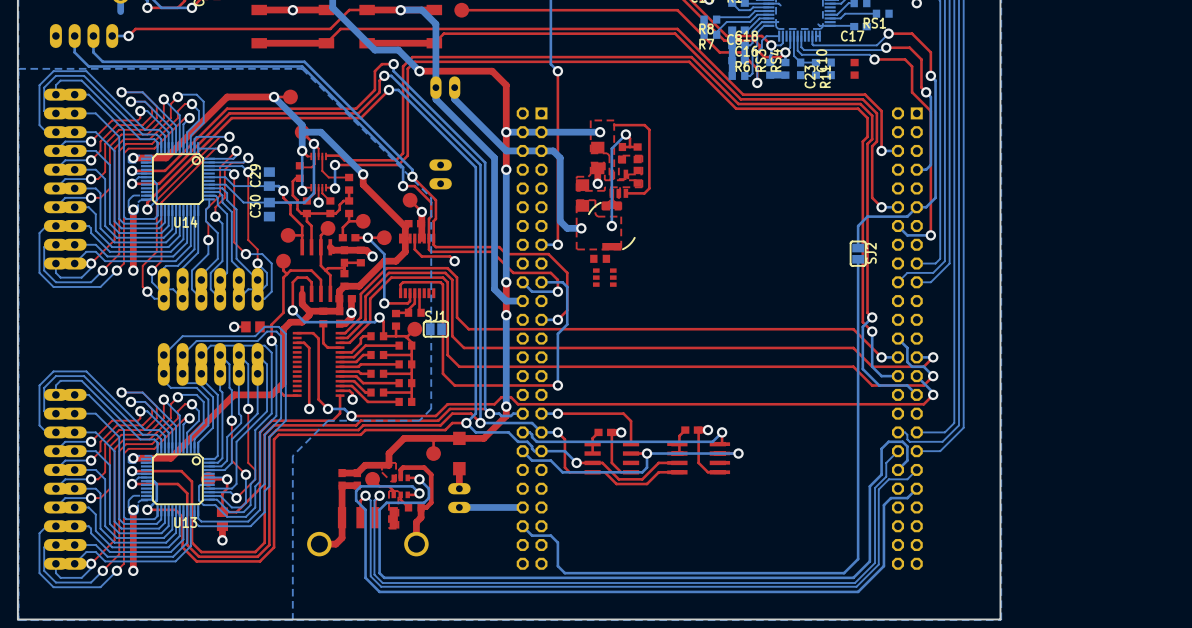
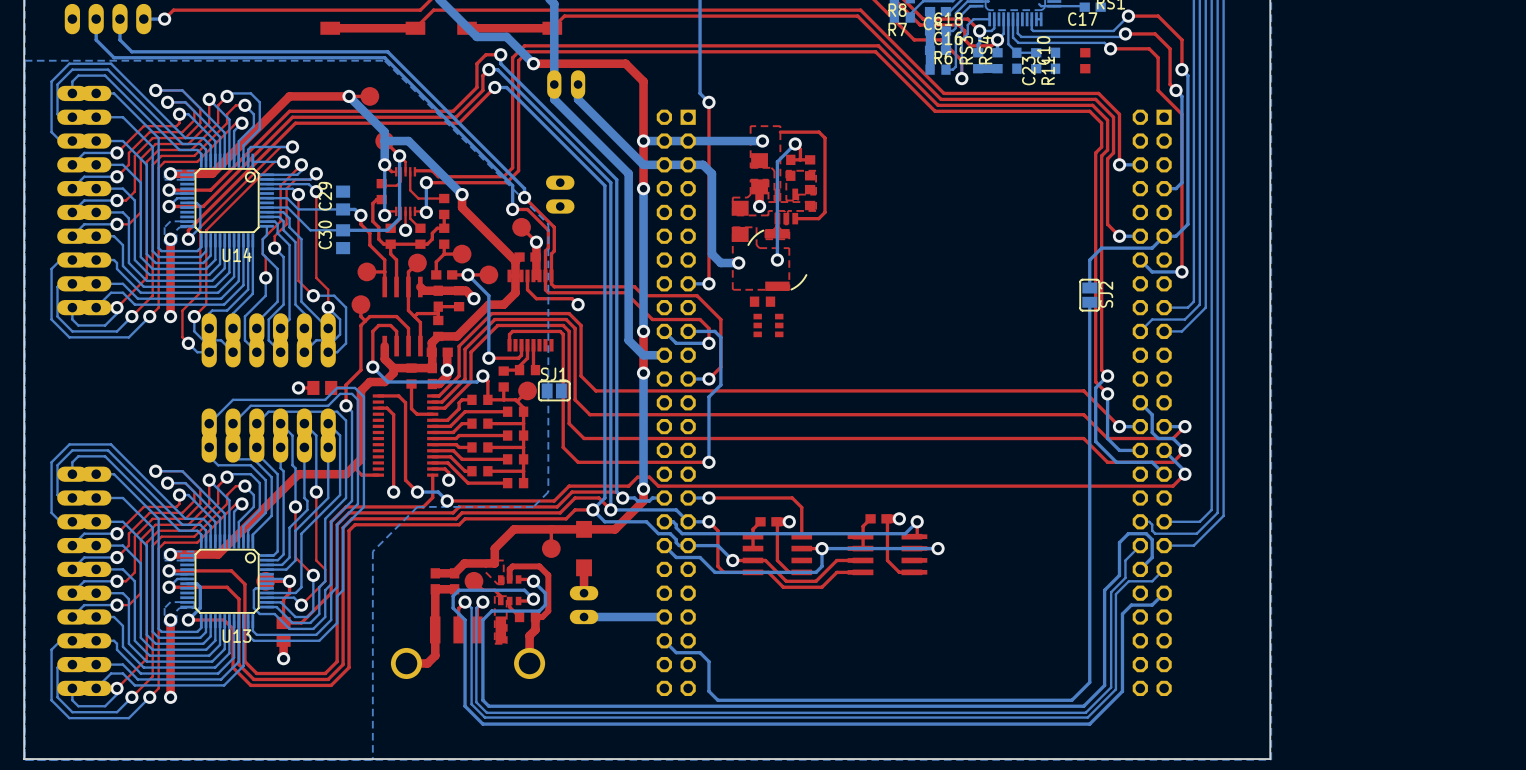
bottom track: (550, 64) (557, 71) -> (700, 54) (700, 93) (708, 102)
top track: (557, 71) (557, 101) -> none
via position: (557, 71) -> (708, 102)

